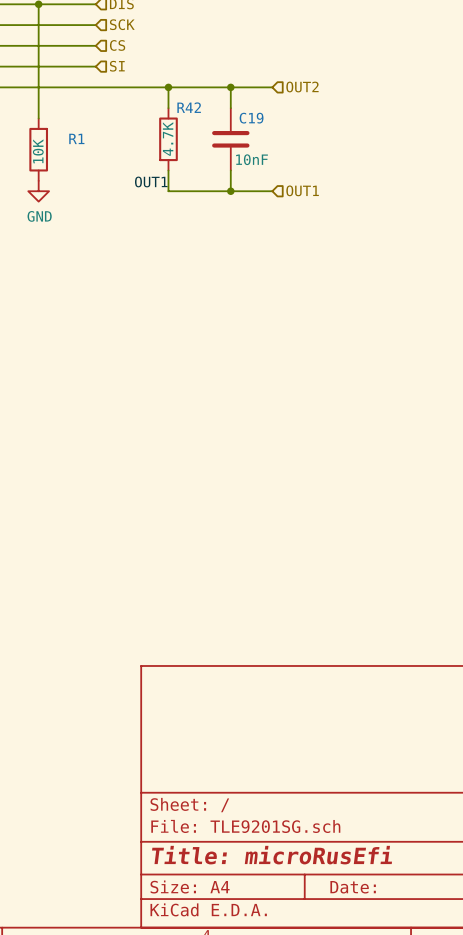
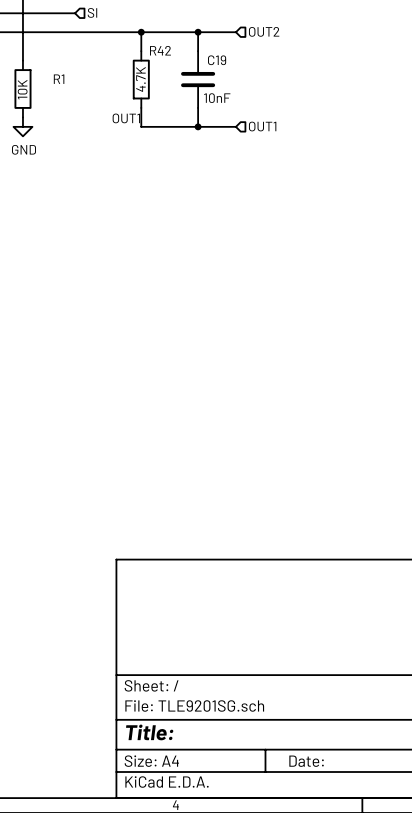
title block: Title: microRusEfi (272, 855) -> Title: (149, 732)

